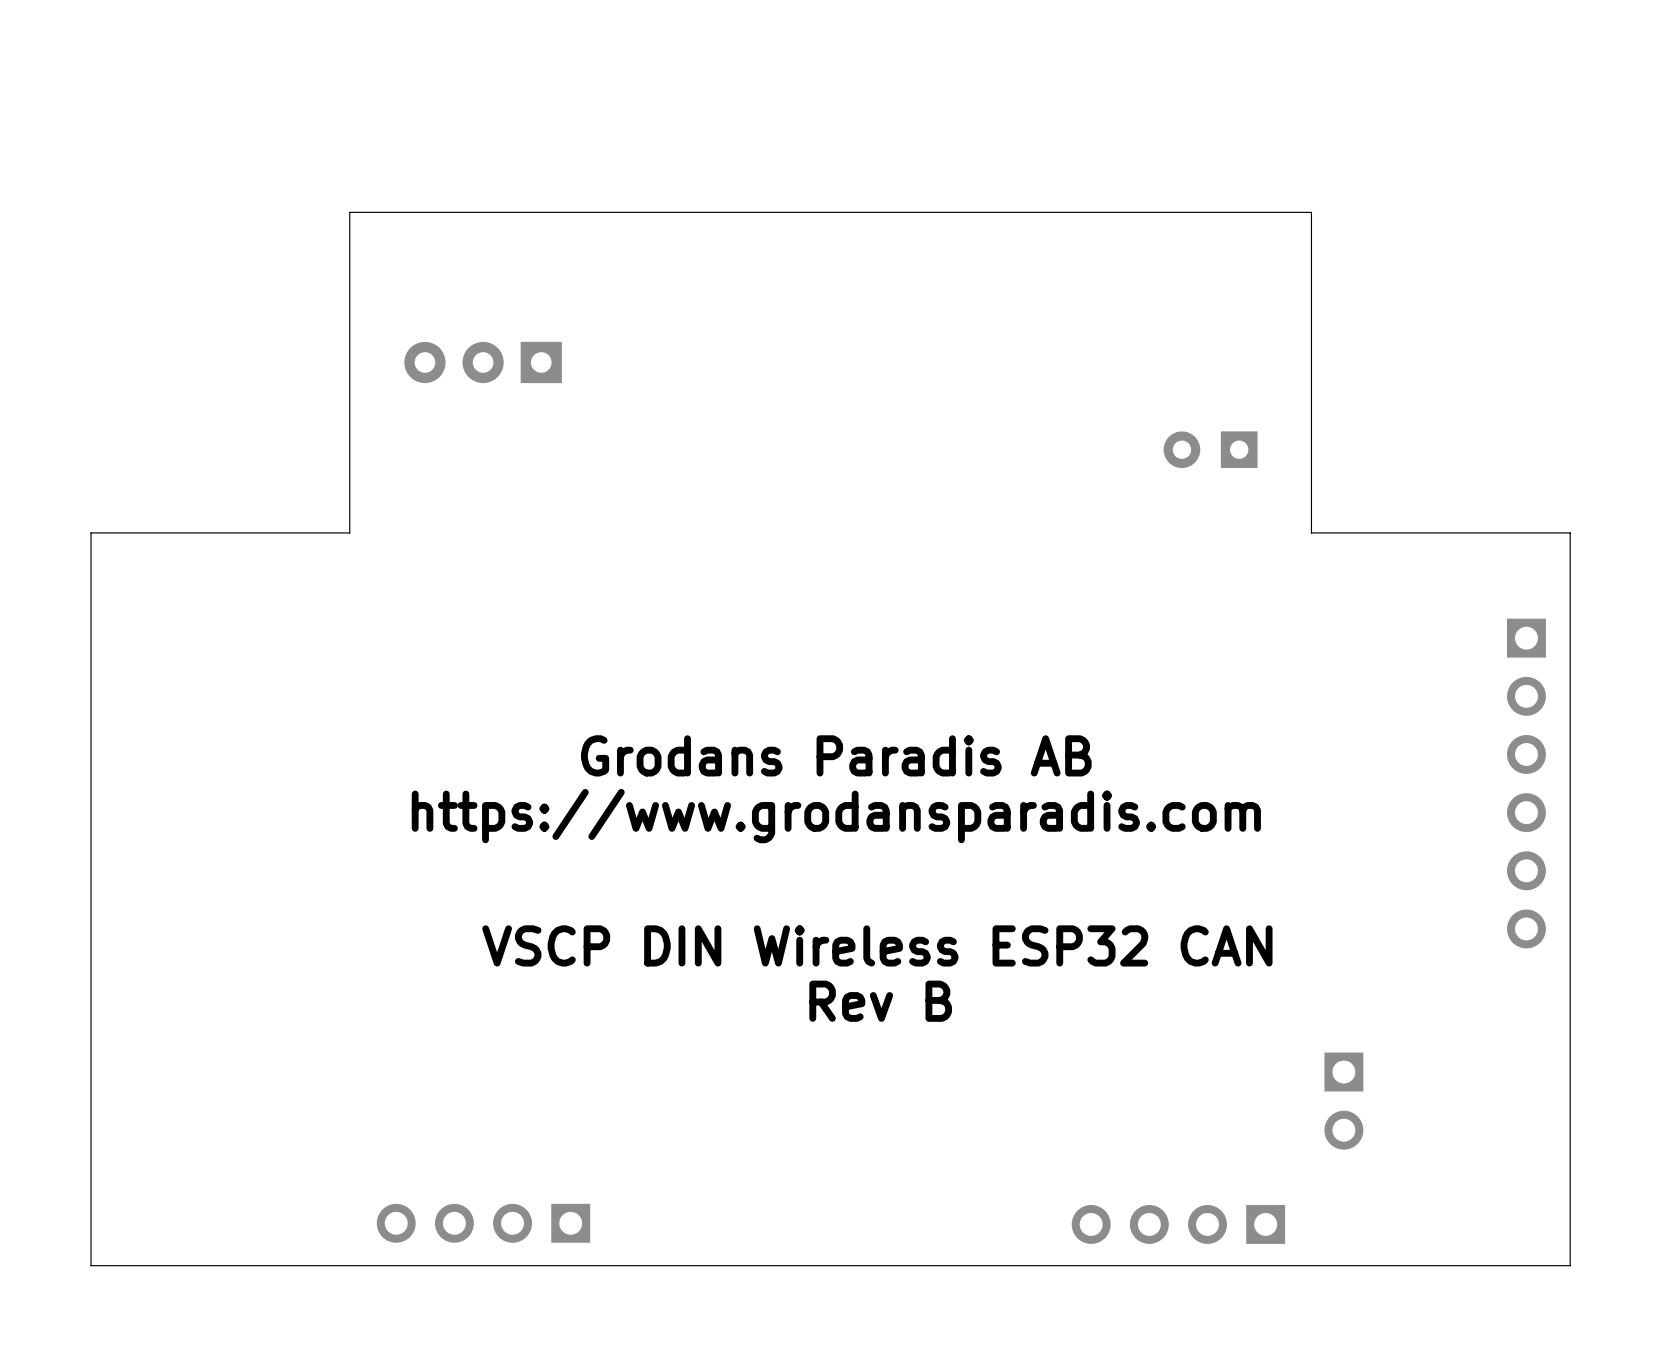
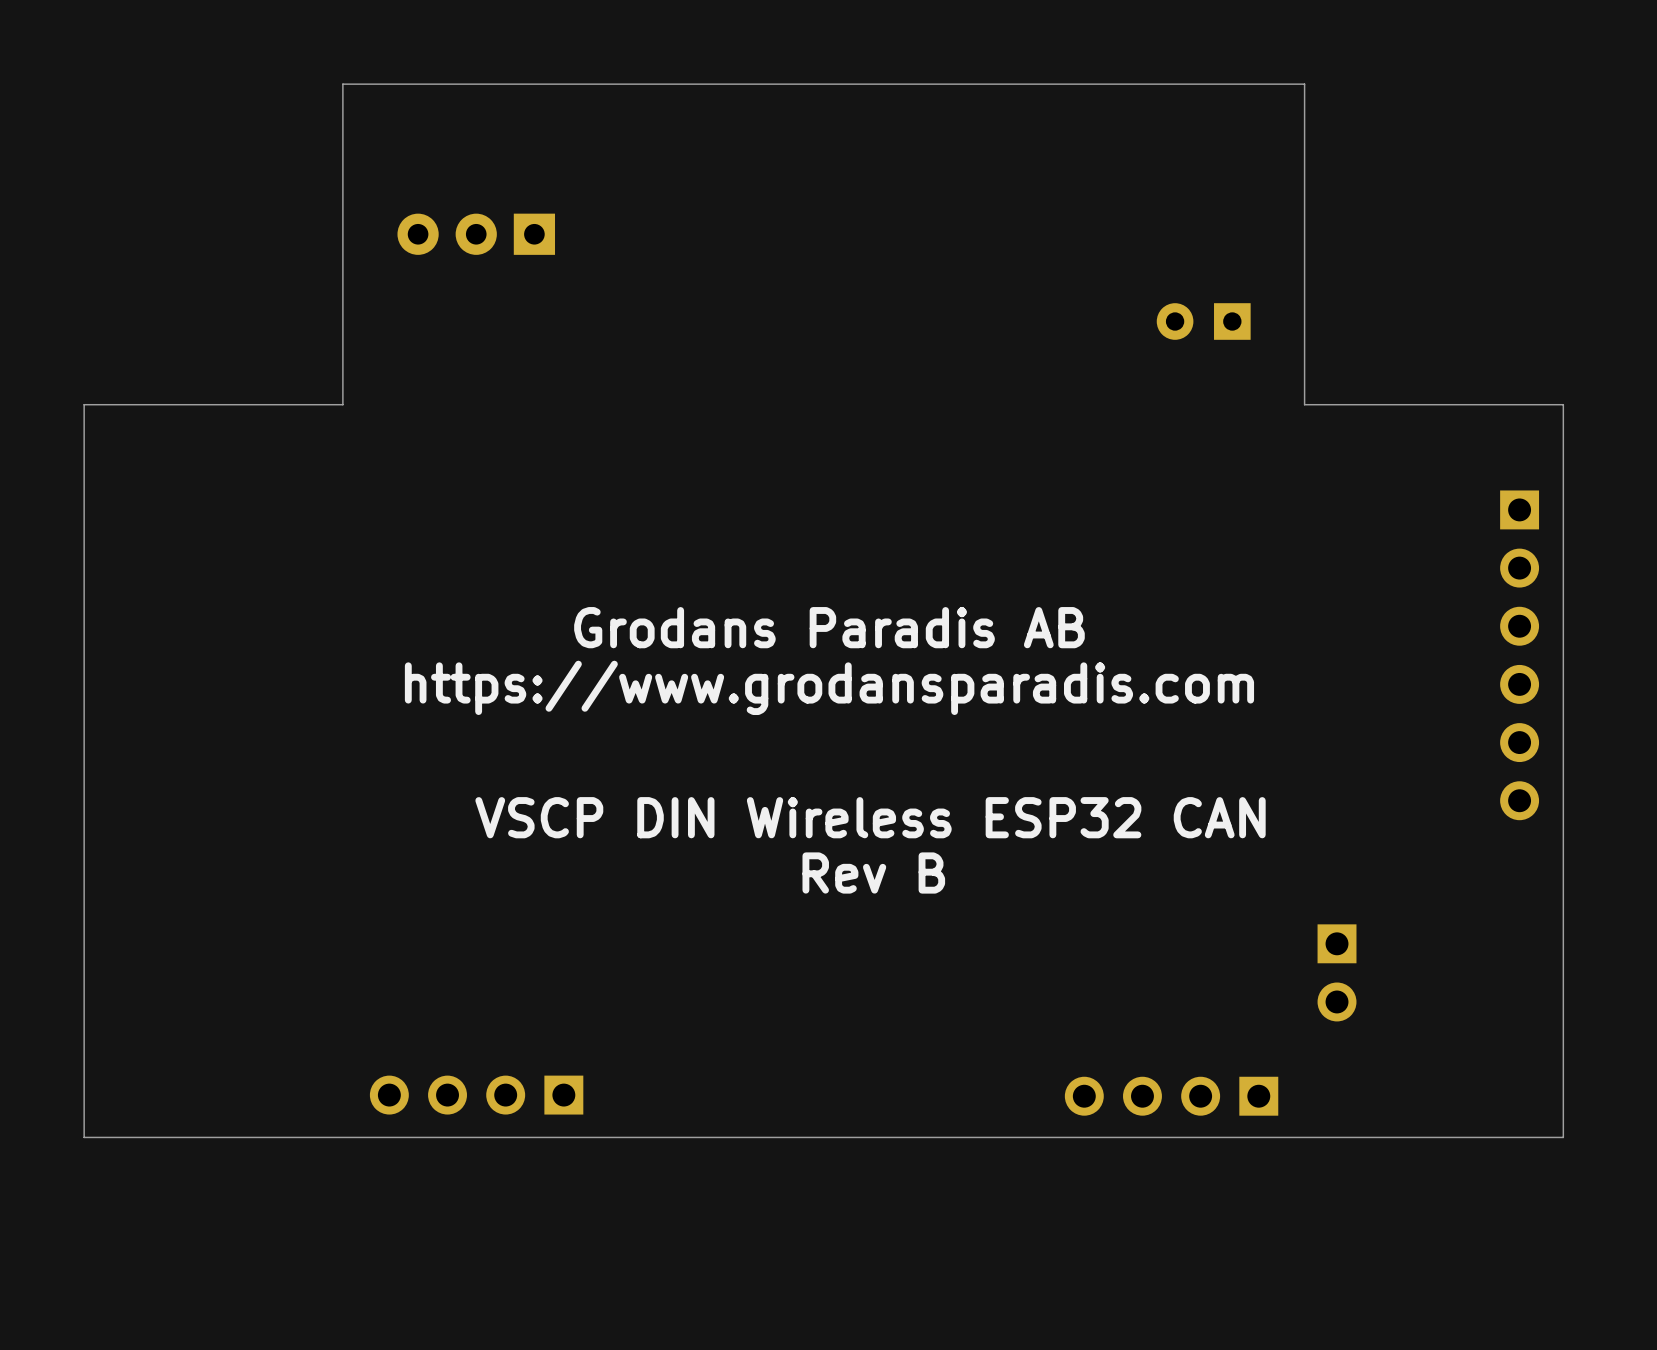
board edge: (1311, 212) (349, 212) (349, 532) (91, 532) (91, 1265) (1570, 1265) (1570, 532) (1311, 532) (1311, 212) -> (1304, 84) (1304, 404) (1563, 404) (1563, 1137) (84, 1137) (84, 404) (342, 404) (342, 84) (1304, 84)
part position: (483, 362) -> (476, 234)
part position: (1210, 449) -> (1203, 321)
text position: Grodans Paradis AB (836, 755) -> Grodans Paradis AB (829, 627)
part position: (1526, 783) -> (1519, 655)
text position: https://www.grodansparadis.com (836, 816) -> https://www.grodansparadis.com (829, 687)
text position: VSCP DIN Wireless ESP32 CAN (877, 945) -> VSCP DIN Wireless ESP32 CAN (870, 817)
text position: Rev B (880, 1001) -> Rev B (873, 873)
part position: (1343, 1101) -> (1337, 972)
part position: (483, 1223) -> (476, 1095)
part position: (1178, 1224) -> (1171, 1096)

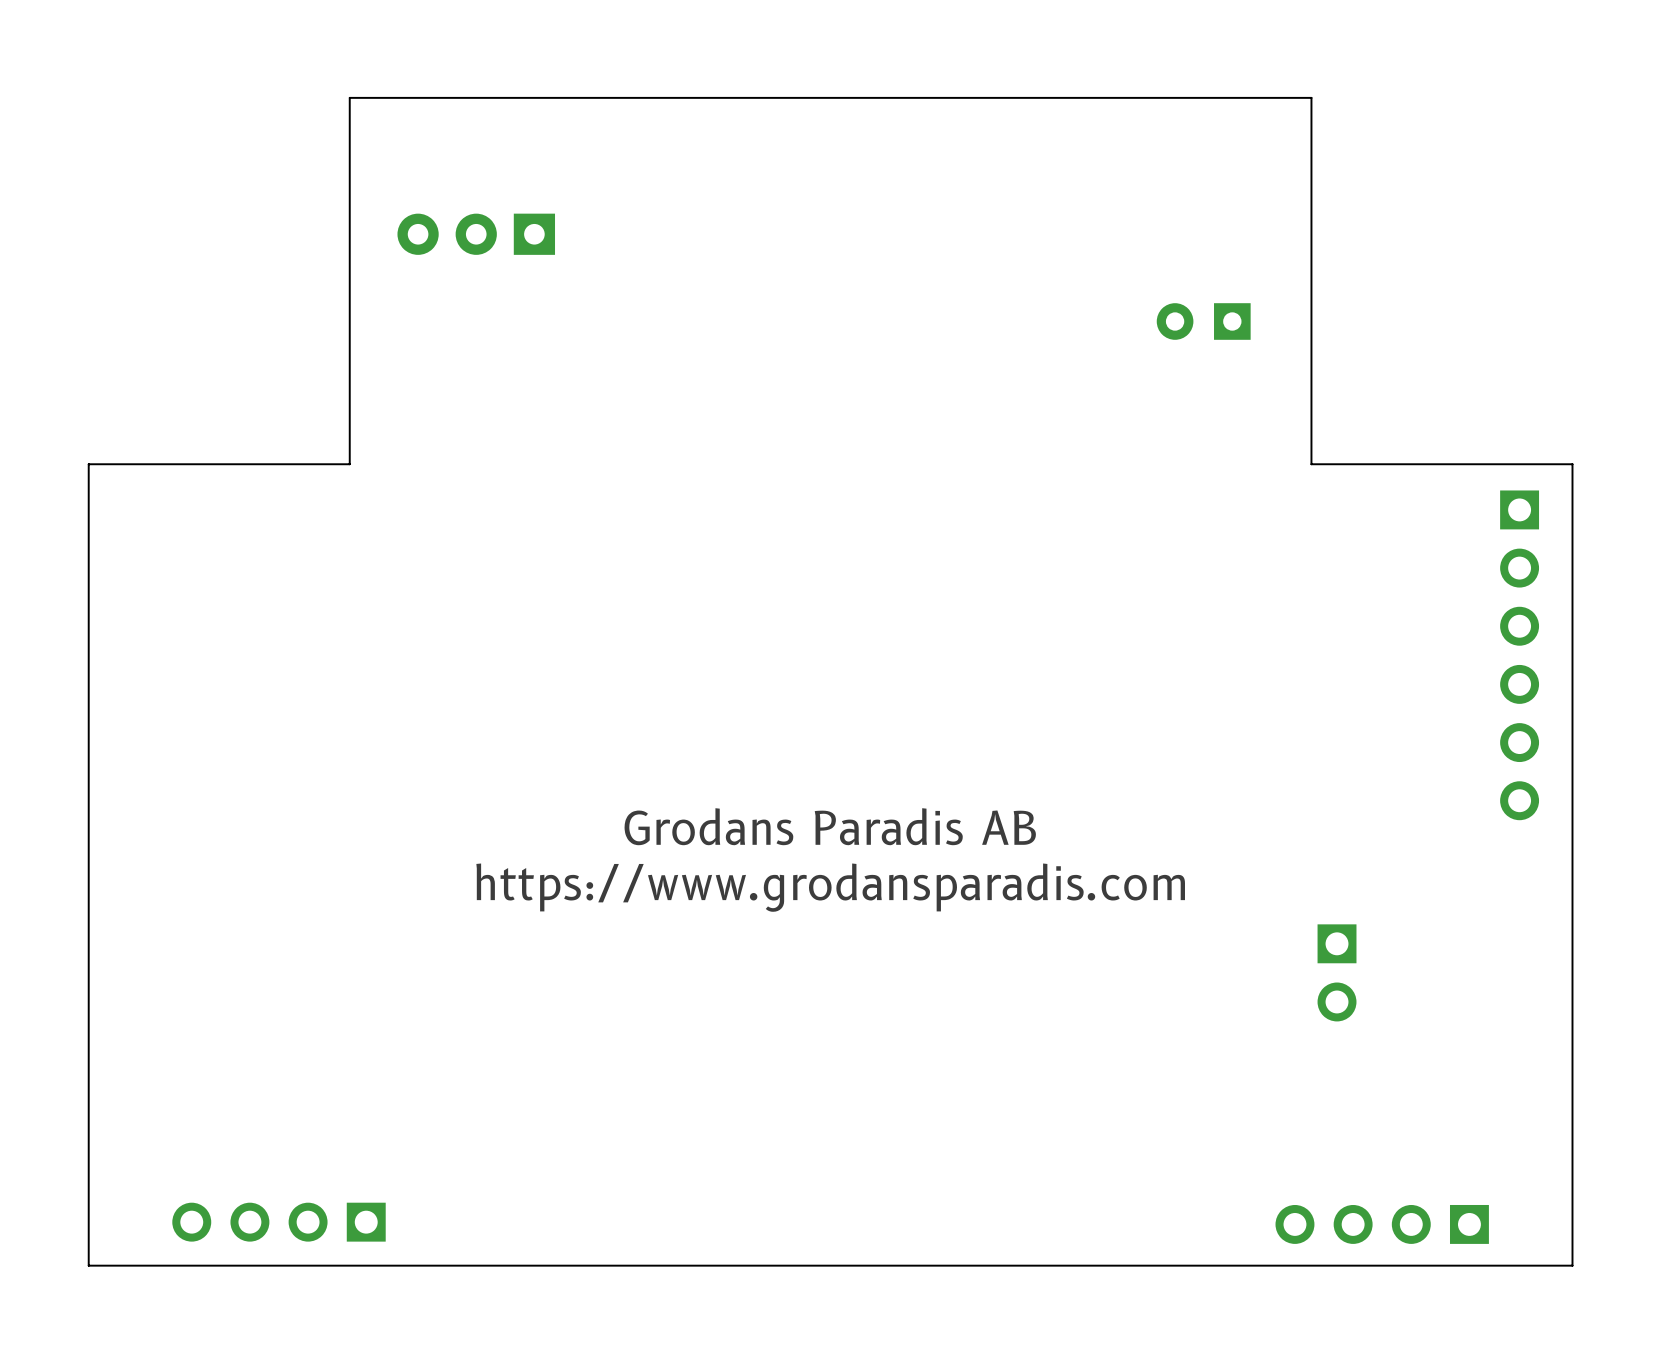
board edge: (1304, 84) (1304, 404) (1563, 404) (1563, 1137) (84, 1137) (84, 404) (342, 404) (342, 84) (1304, 84) -> (1311, 97) (1311, 464) (1572, 464) (1572, 1265) (88, 1265) (88, 464) (349, 464) (349, 97) (1311, 97)
text position: Grodans Paradis AB (829, 627) -> Grodans Paradis AB (830, 826)
text position: https://www.grodansparadis.com (829, 687) -> https://www.grodansparadis.com (830, 887)
text: VSCP DIN Wireless ESP32 CAN (870, 817) -> none
text: Rev B (873, 873) -> none
part position: (476, 1095) -> (279, 1222)
part position: (1171, 1096) -> (1382, 1224)

